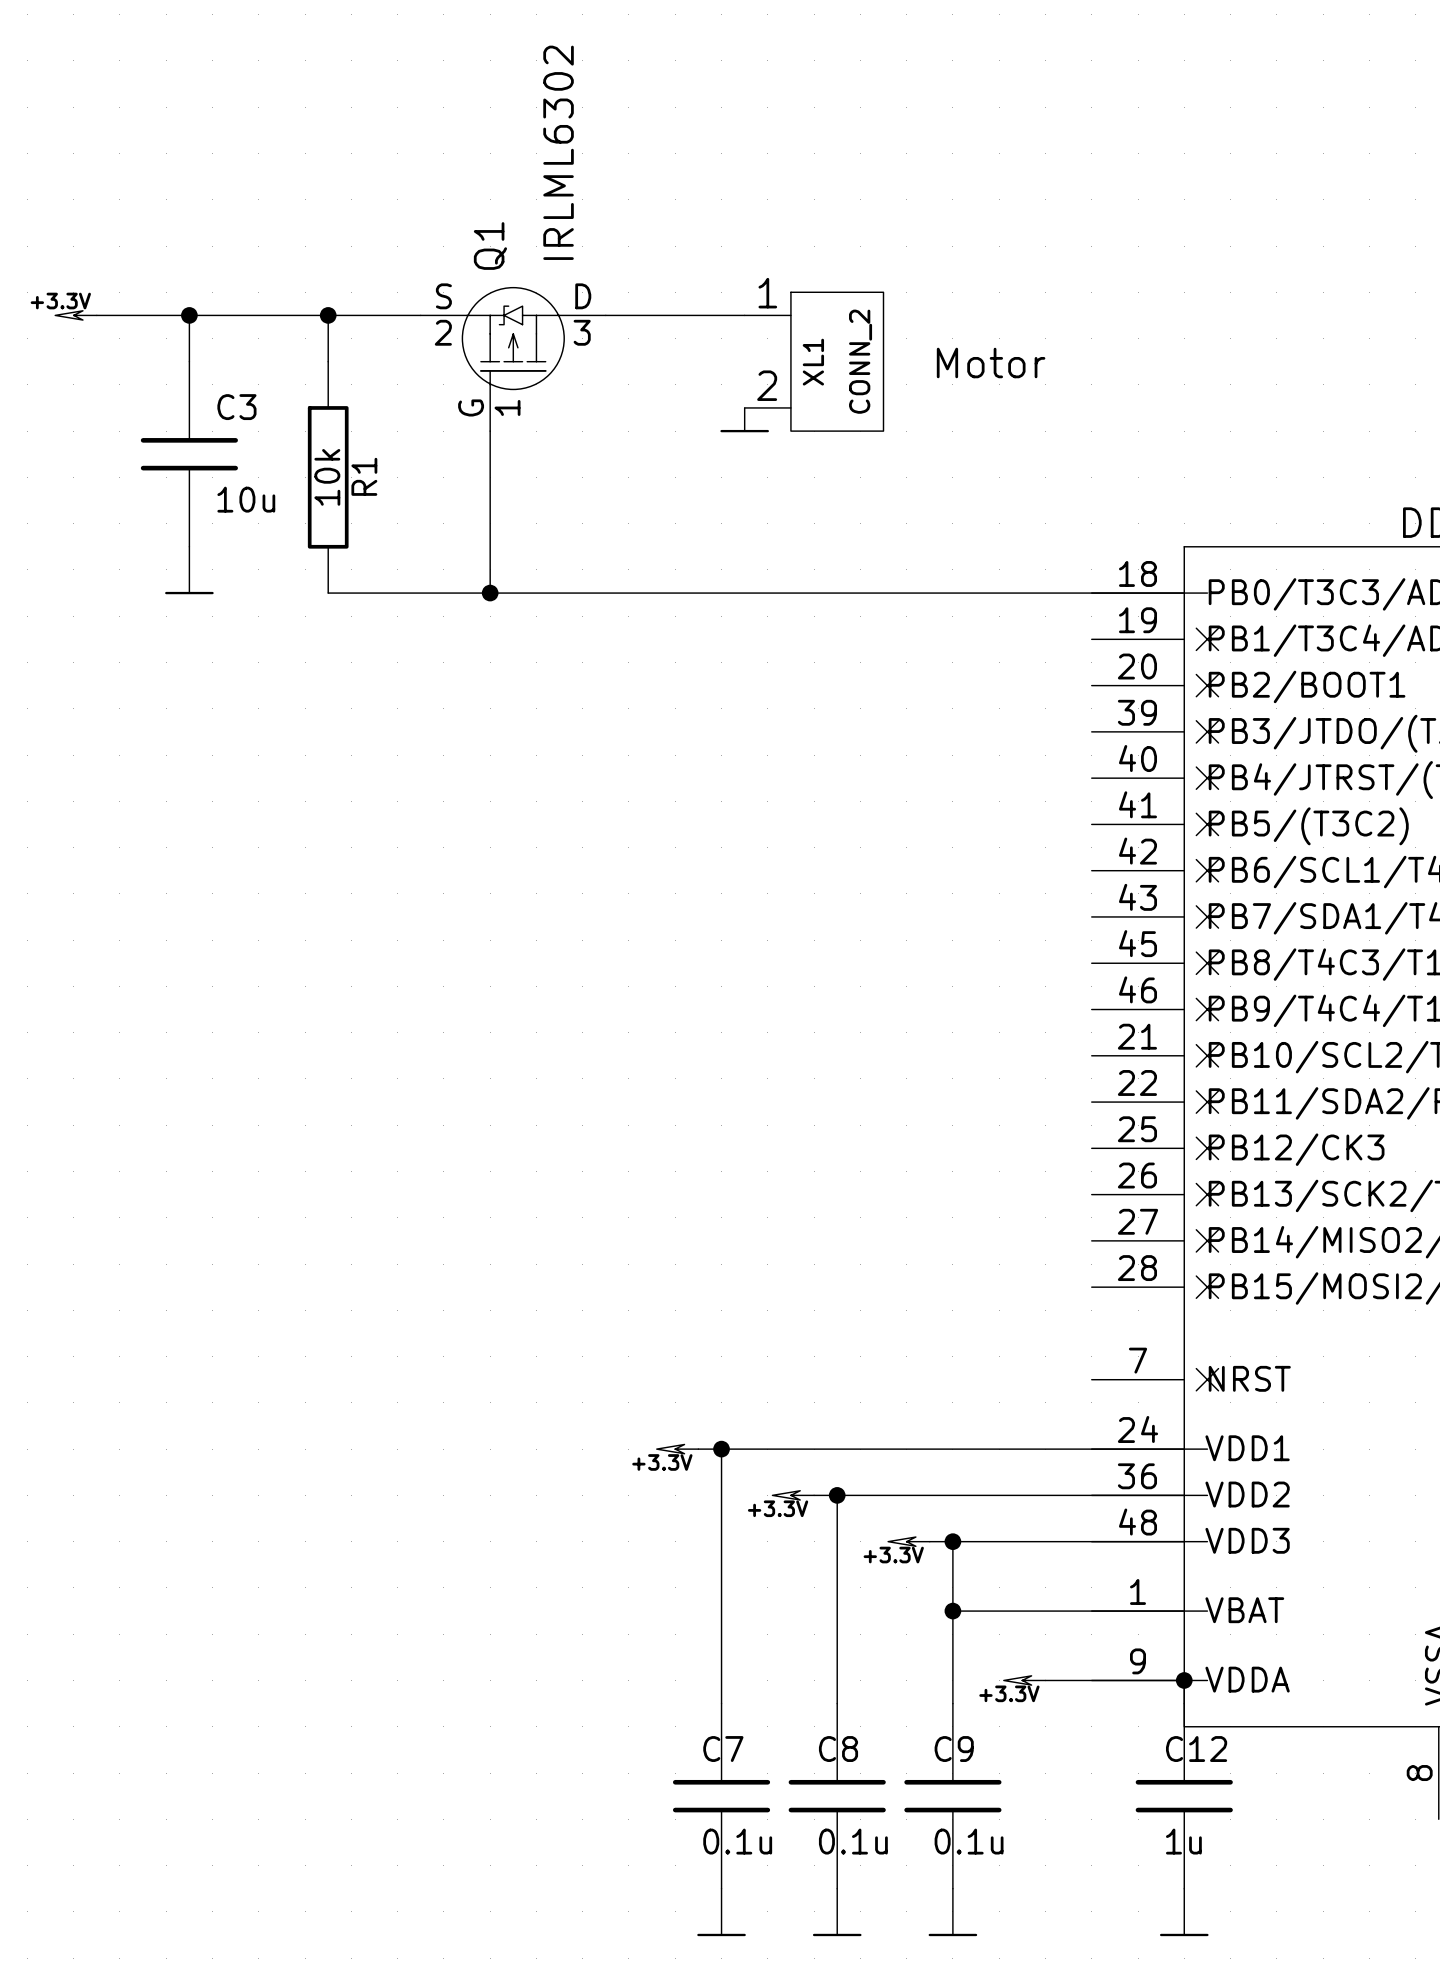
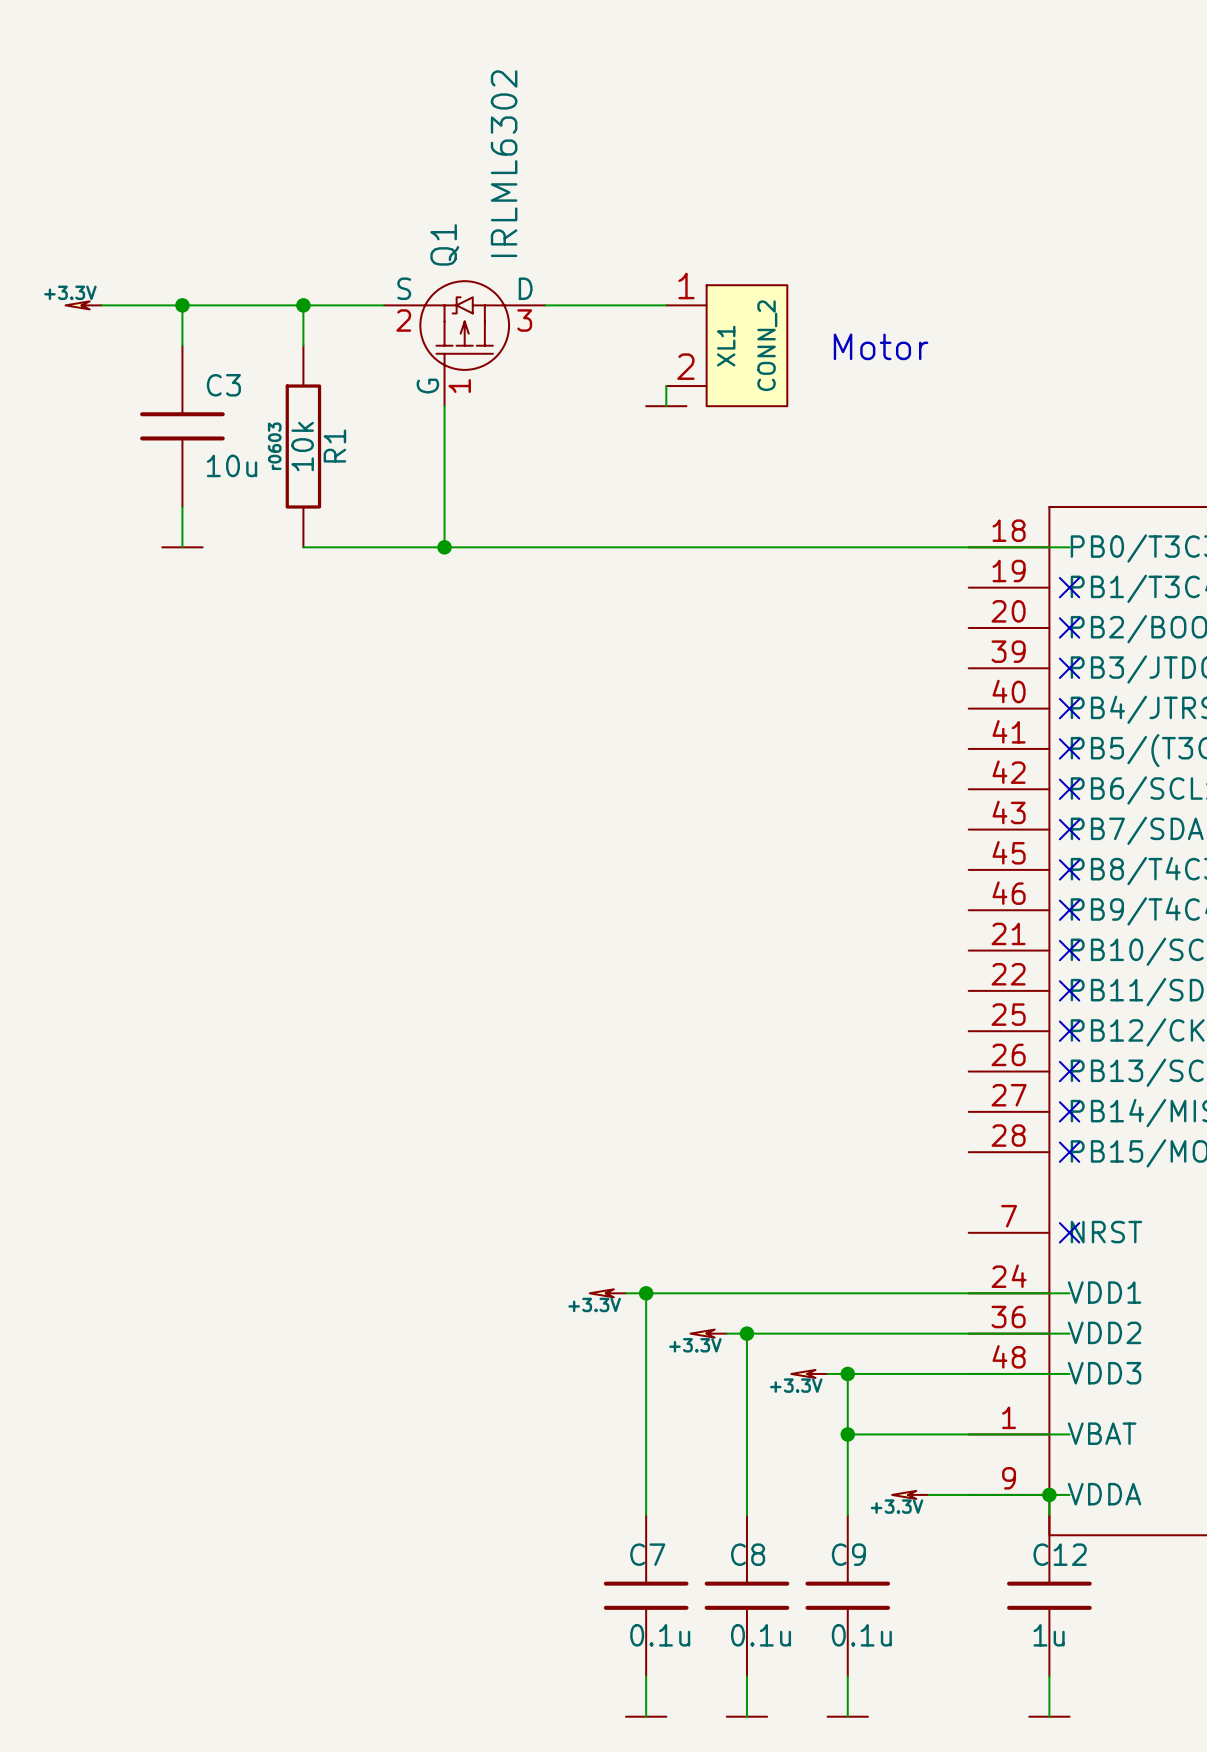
R1 text: none -> r0603 (274, 446)

